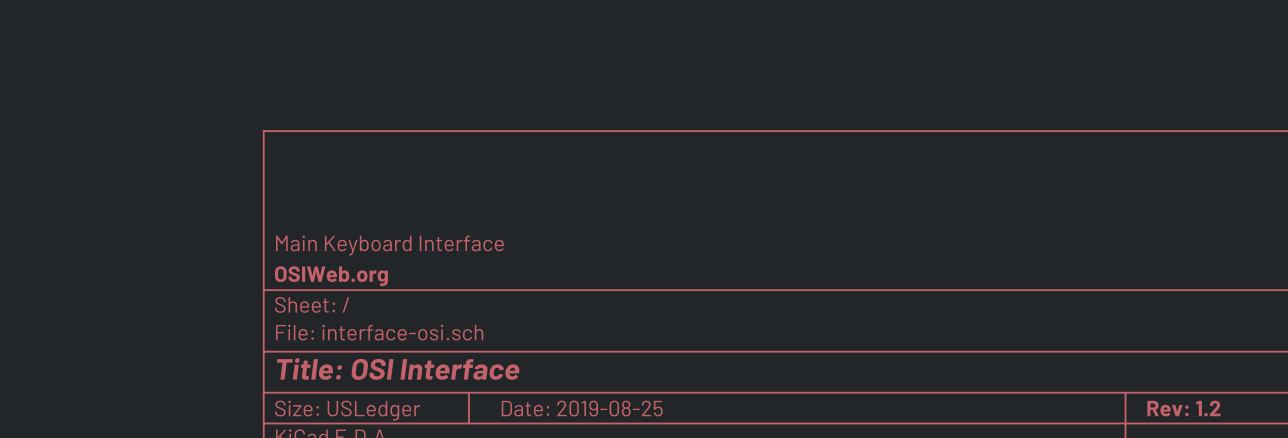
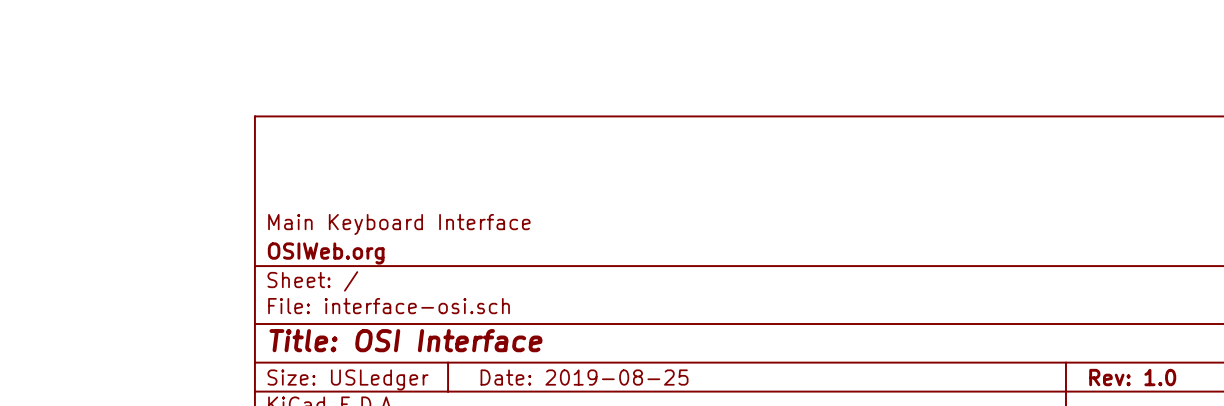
title block: Rev: 1.2 (1183, 408) -> Rev: 1.0 (1132, 377)

